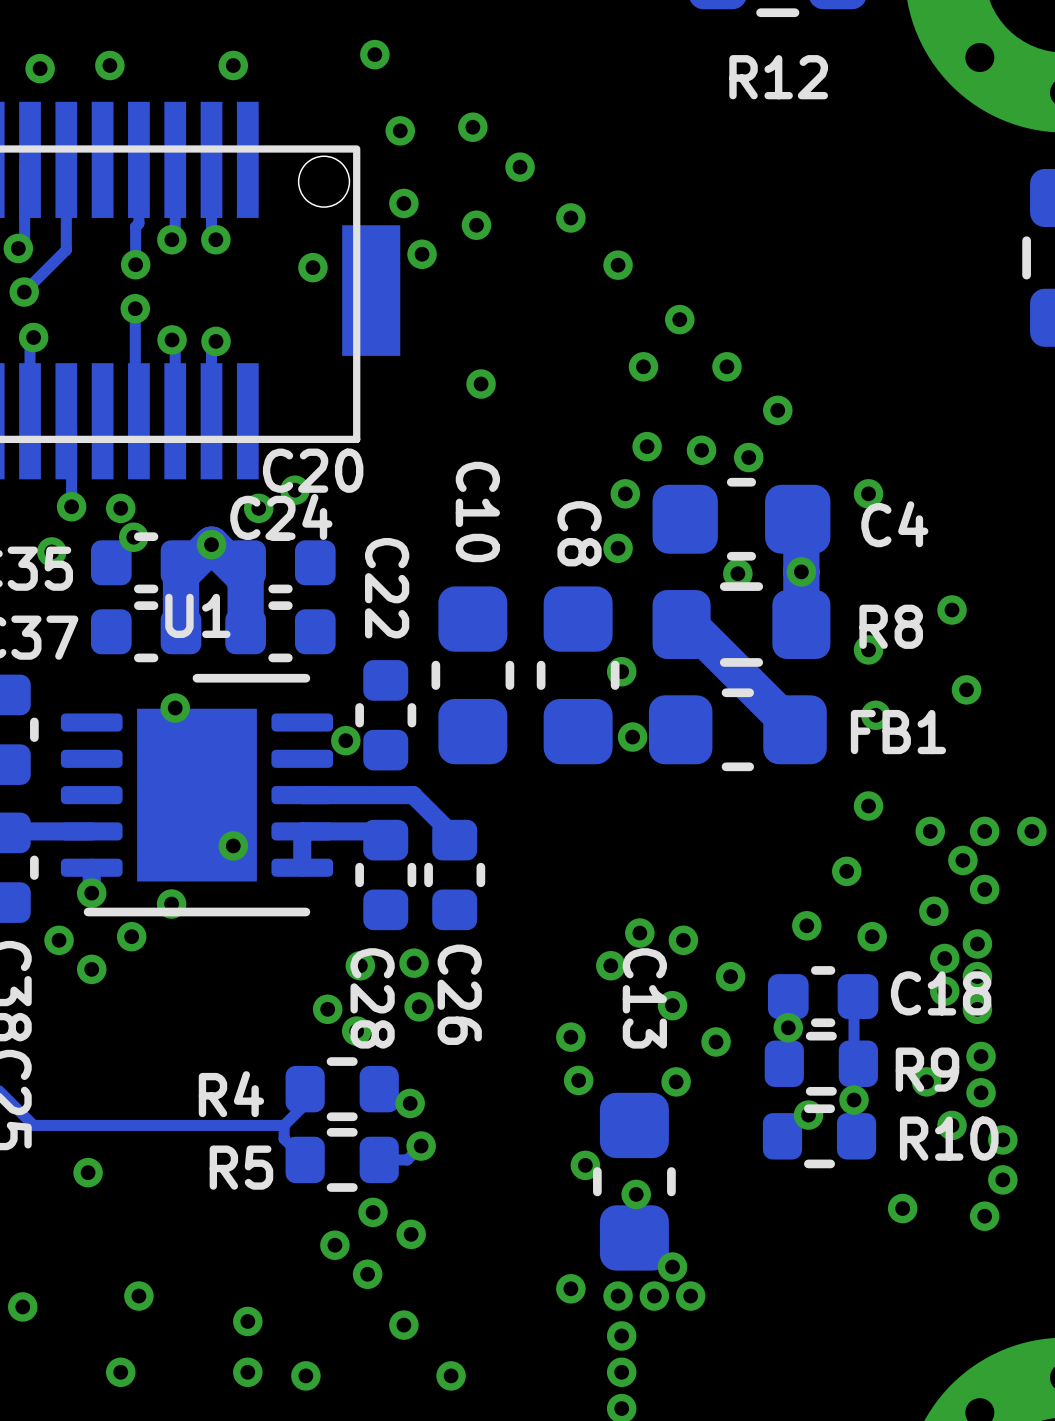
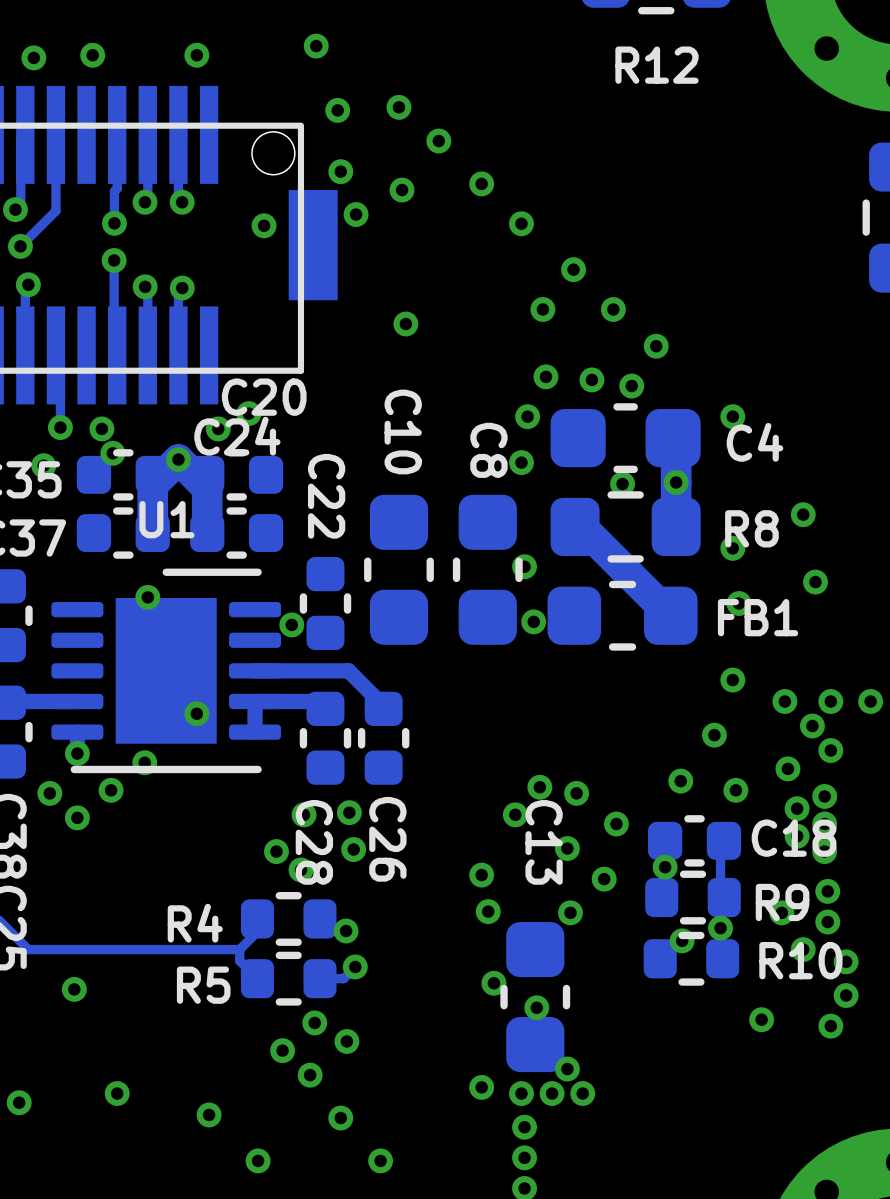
via: (120, 1372) -> none
via: (247, 1372) -> none

